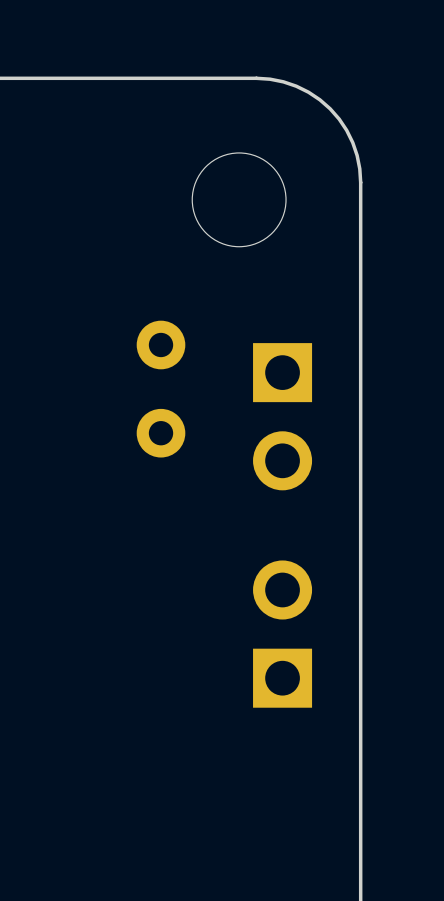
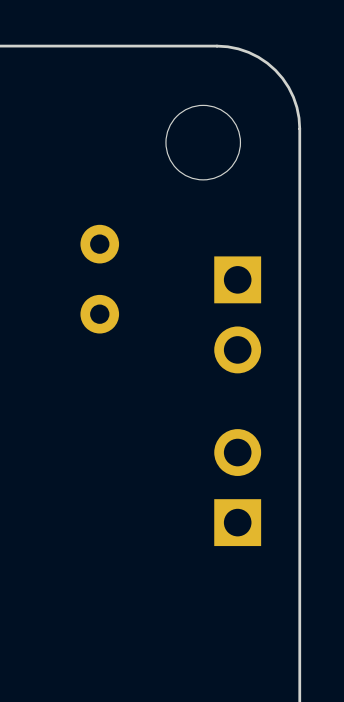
part position: (161, 389) -> (99, 279)

